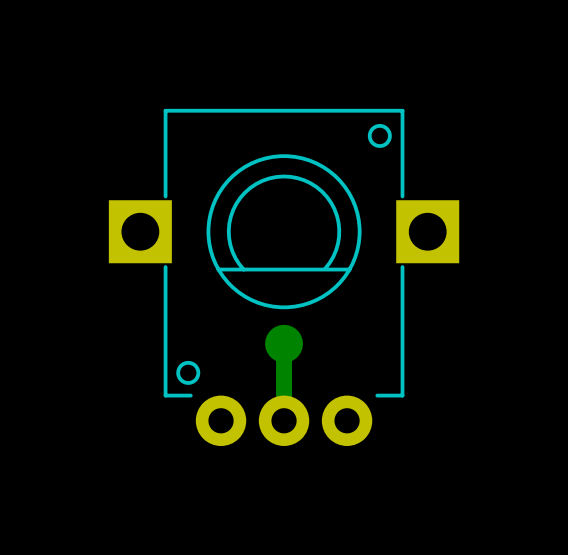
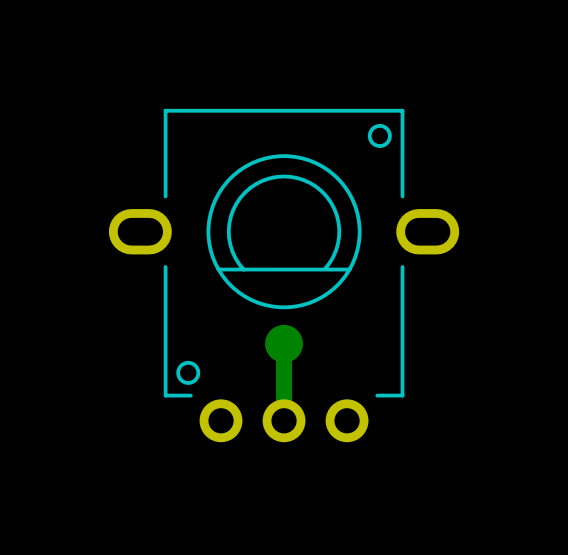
part footprint: [108, 108, 460, 446] -> [108, 108, 460, 443]

